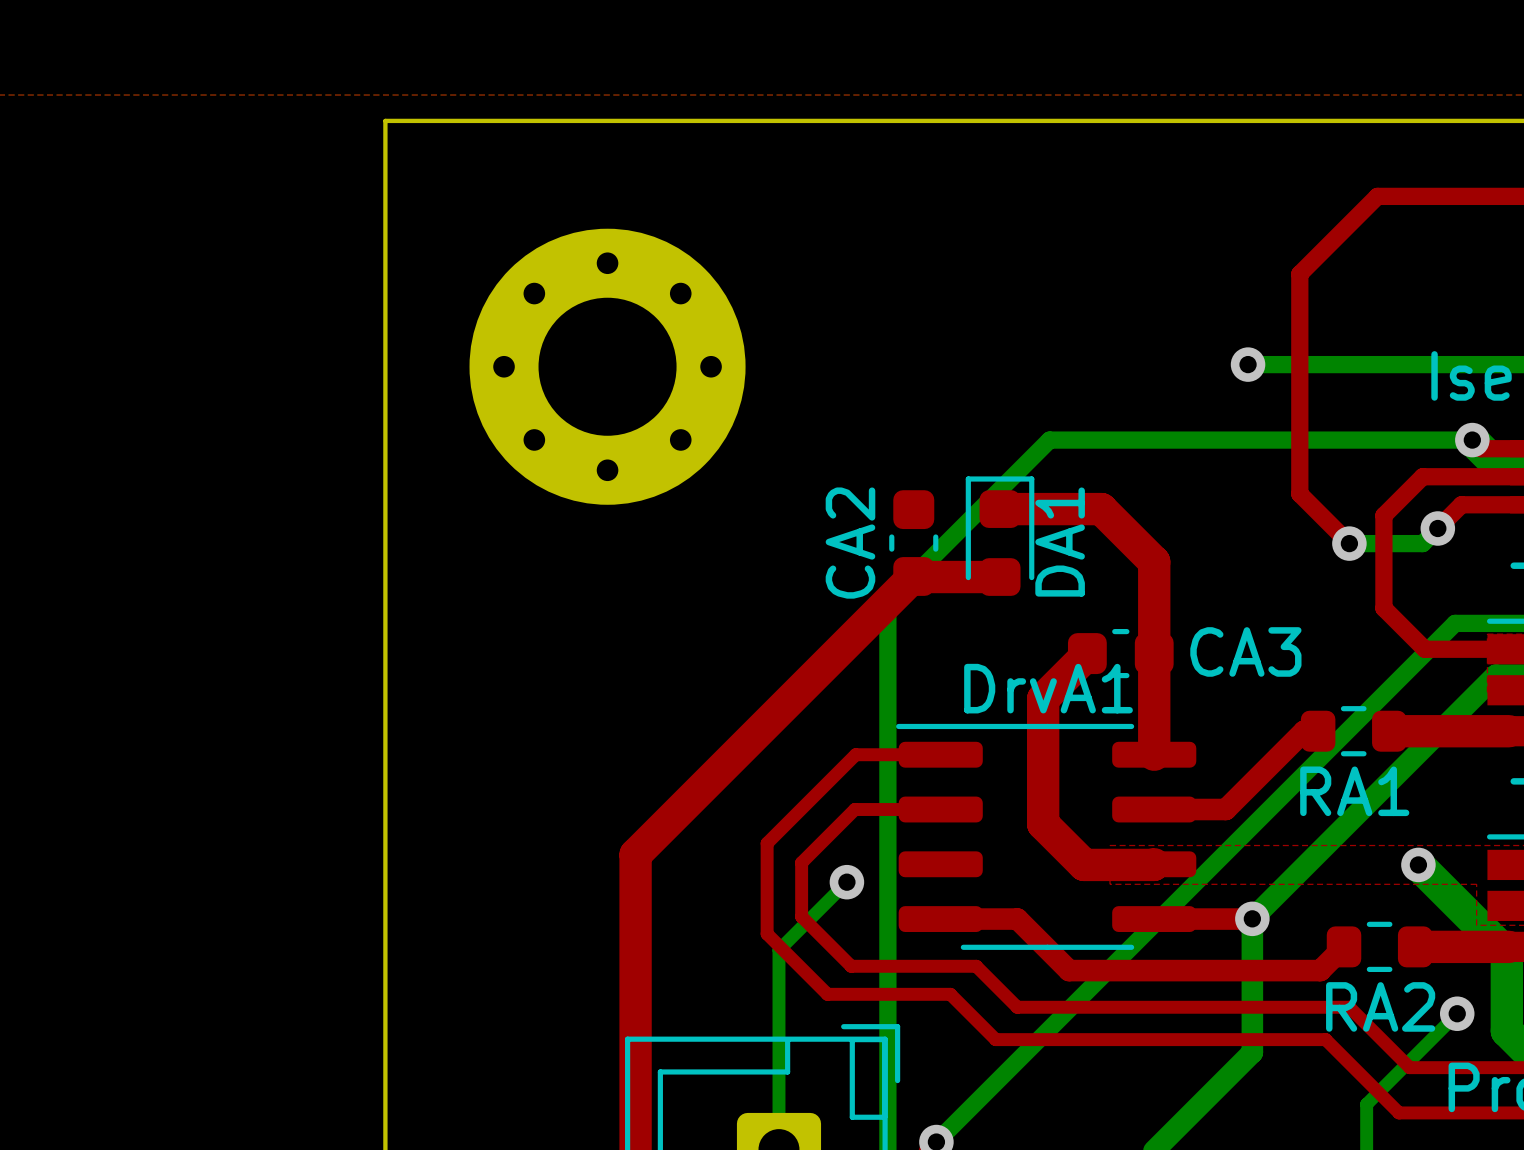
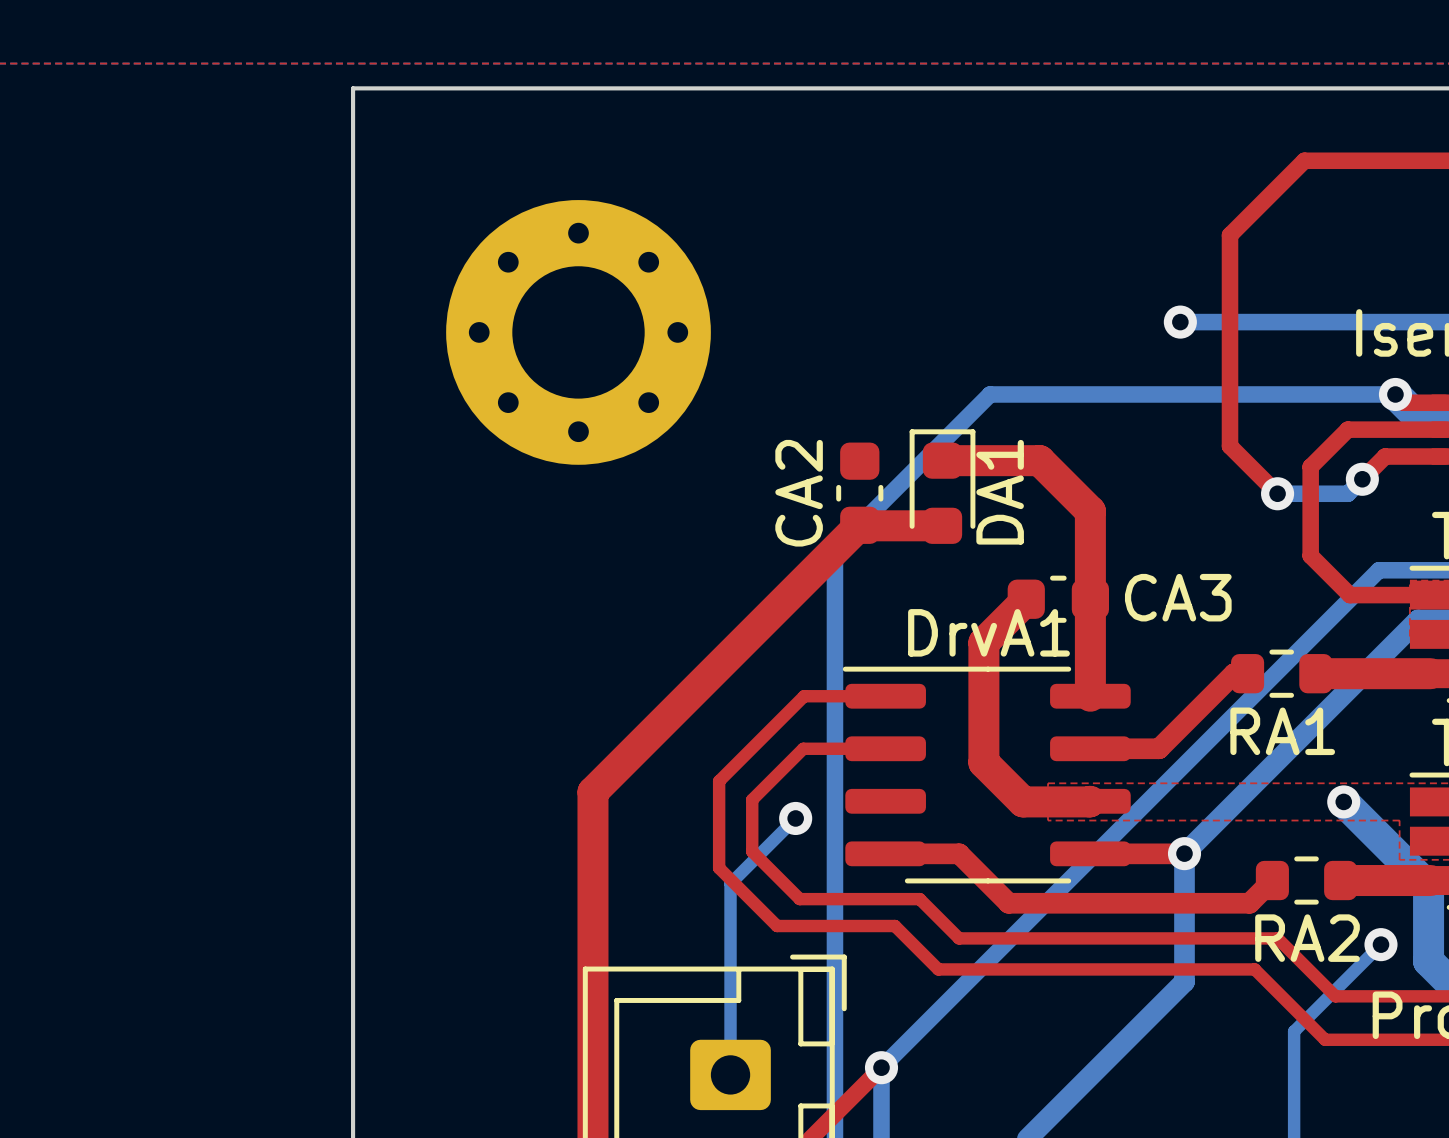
part position: (607, 366) -> (578, 332)

